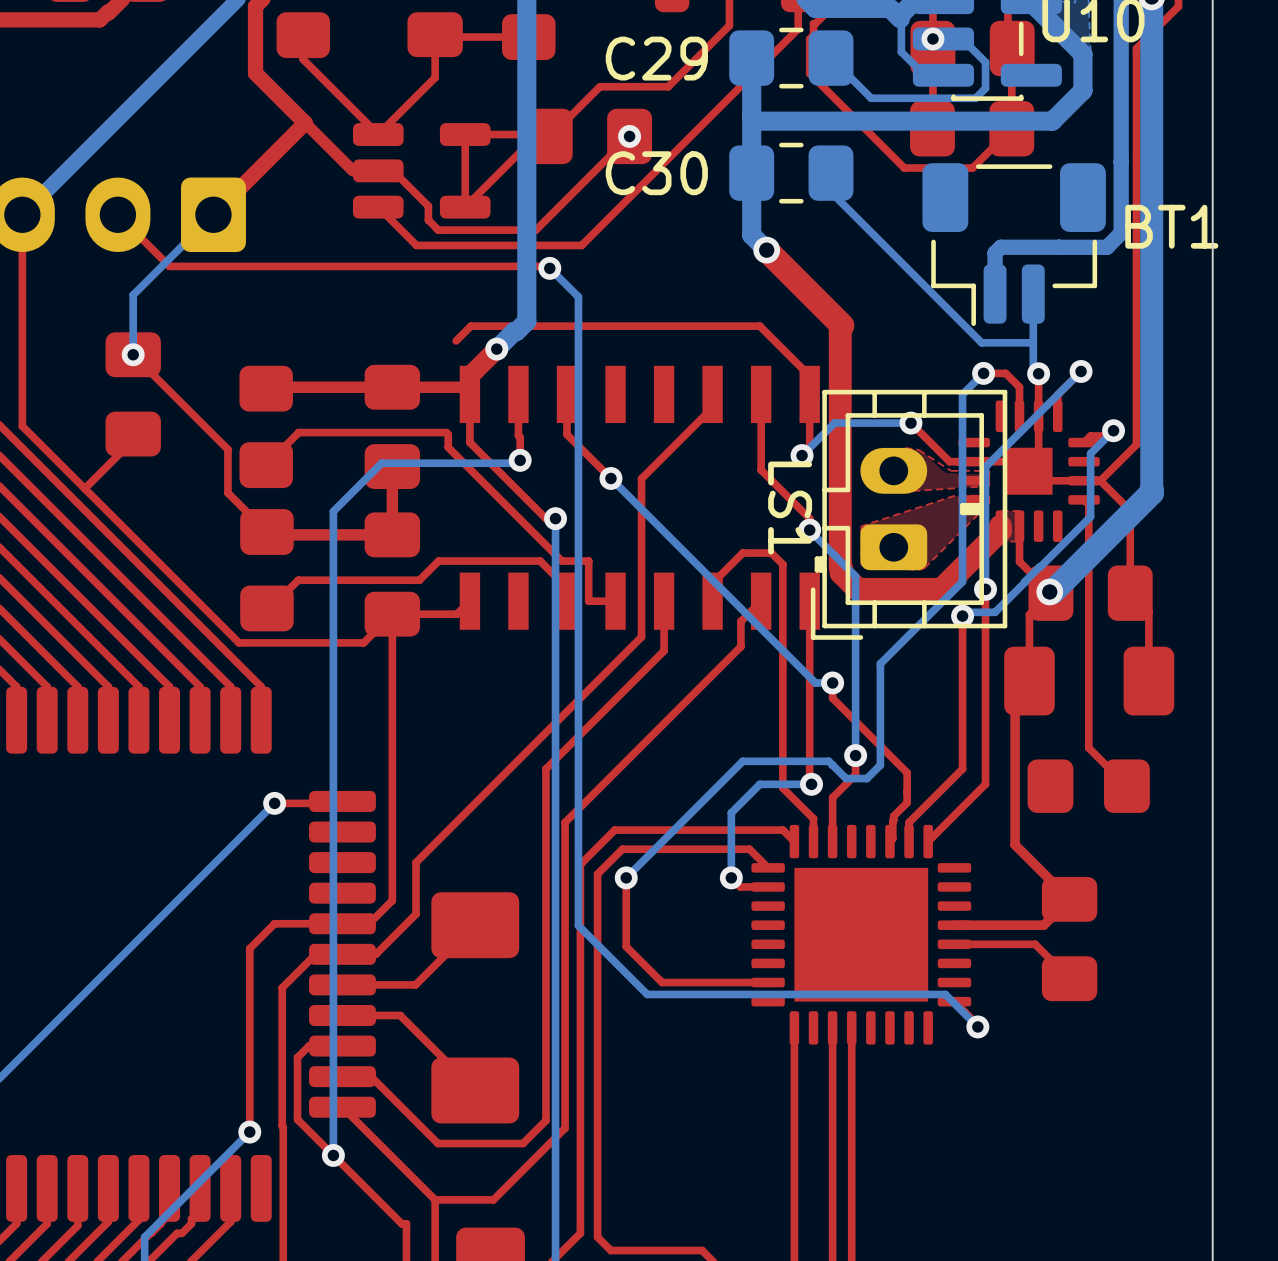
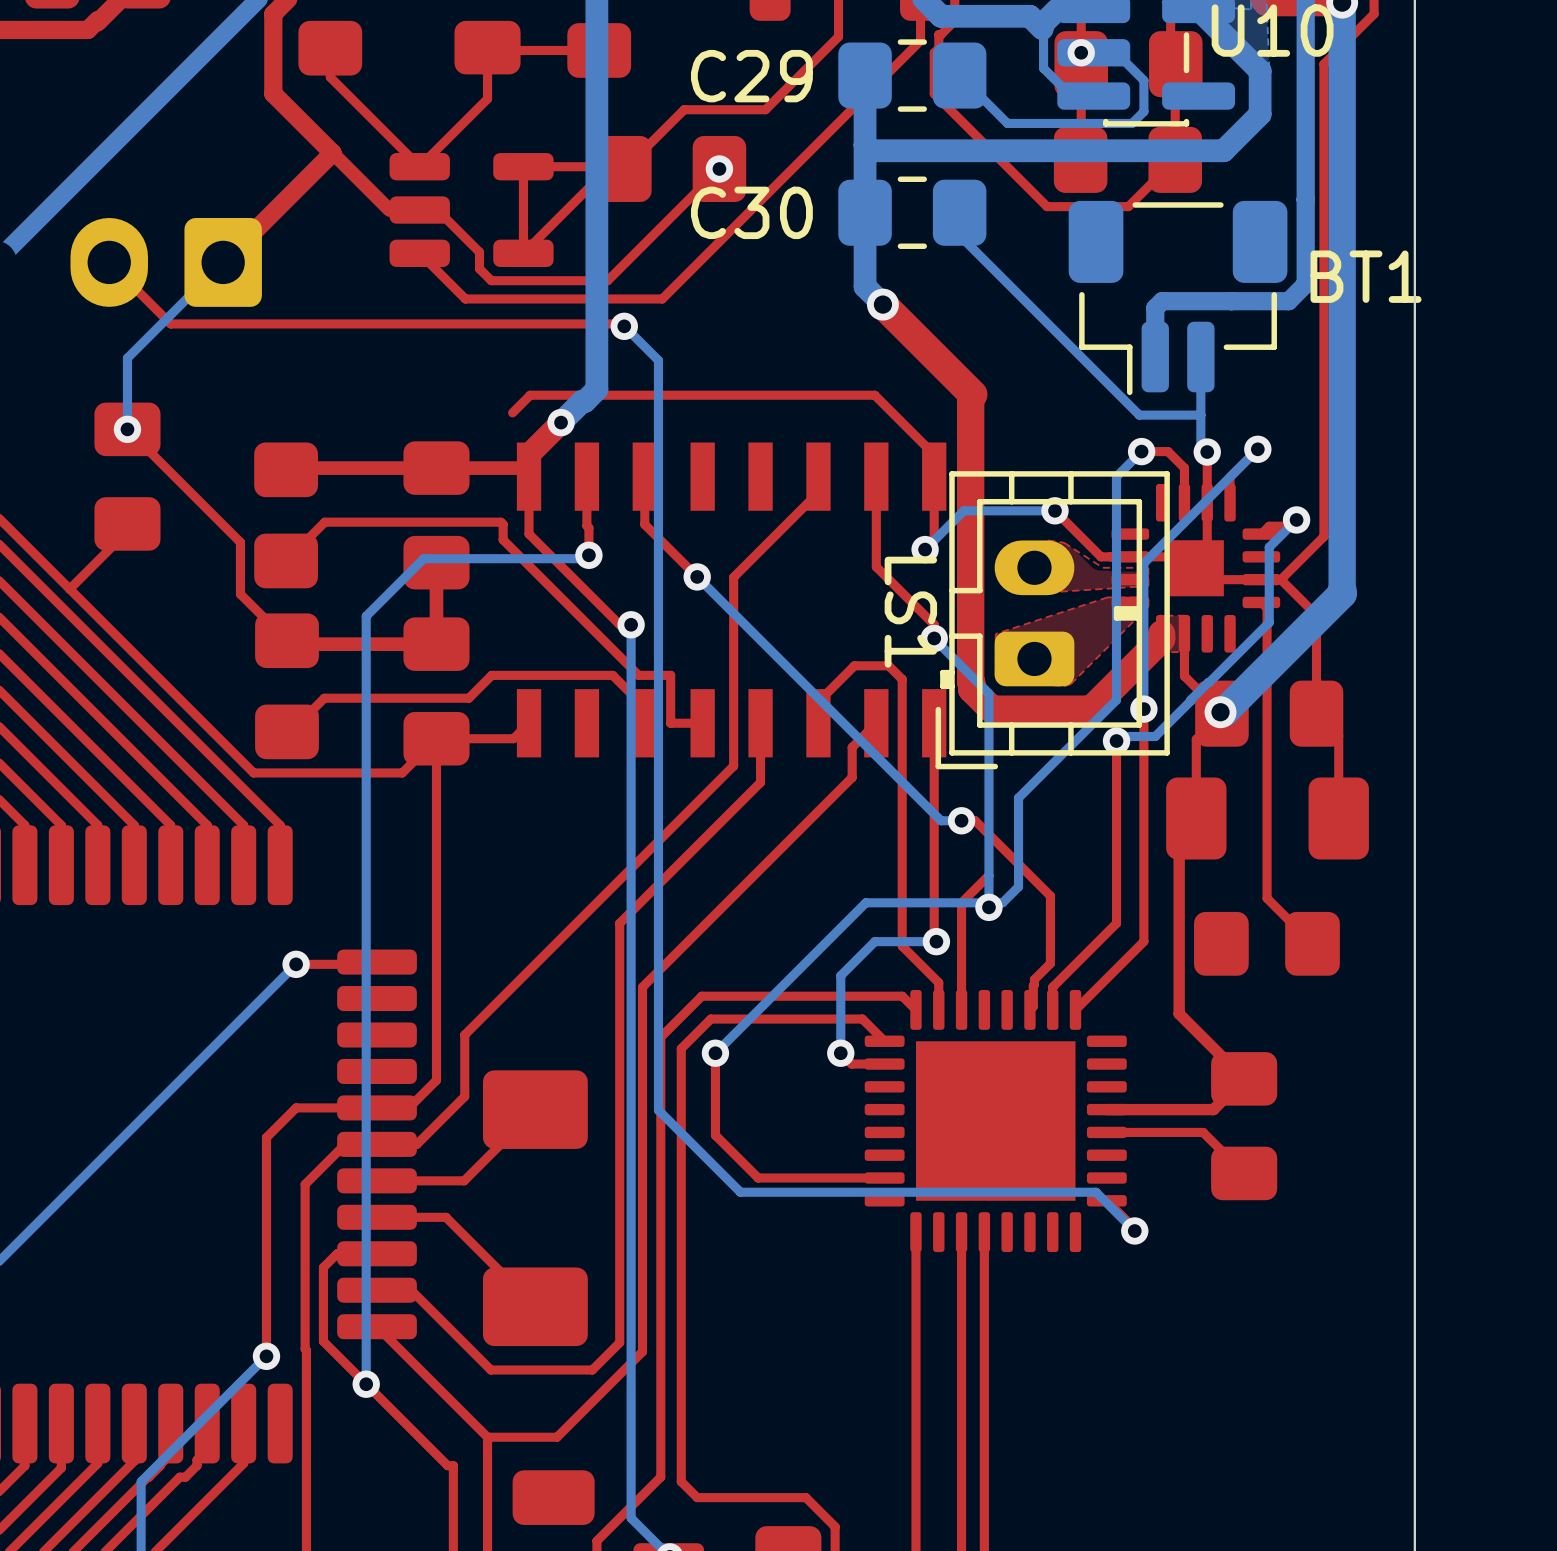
top track: (832, 682) (832, 698) (907, 772) -> (961, 820) (975, 820) (1050, 895) (1050, 927)
bottom track: (880, 738) (880, 765) (866, 778) (846, 778) (828, 761) (742, 761) -> (1018, 886) (1002, 902) (865, 902) (854, 914)
top track: (855, 755) (855, 774) (832, 797) -> (988, 875) (961, 902) (961, 957)

